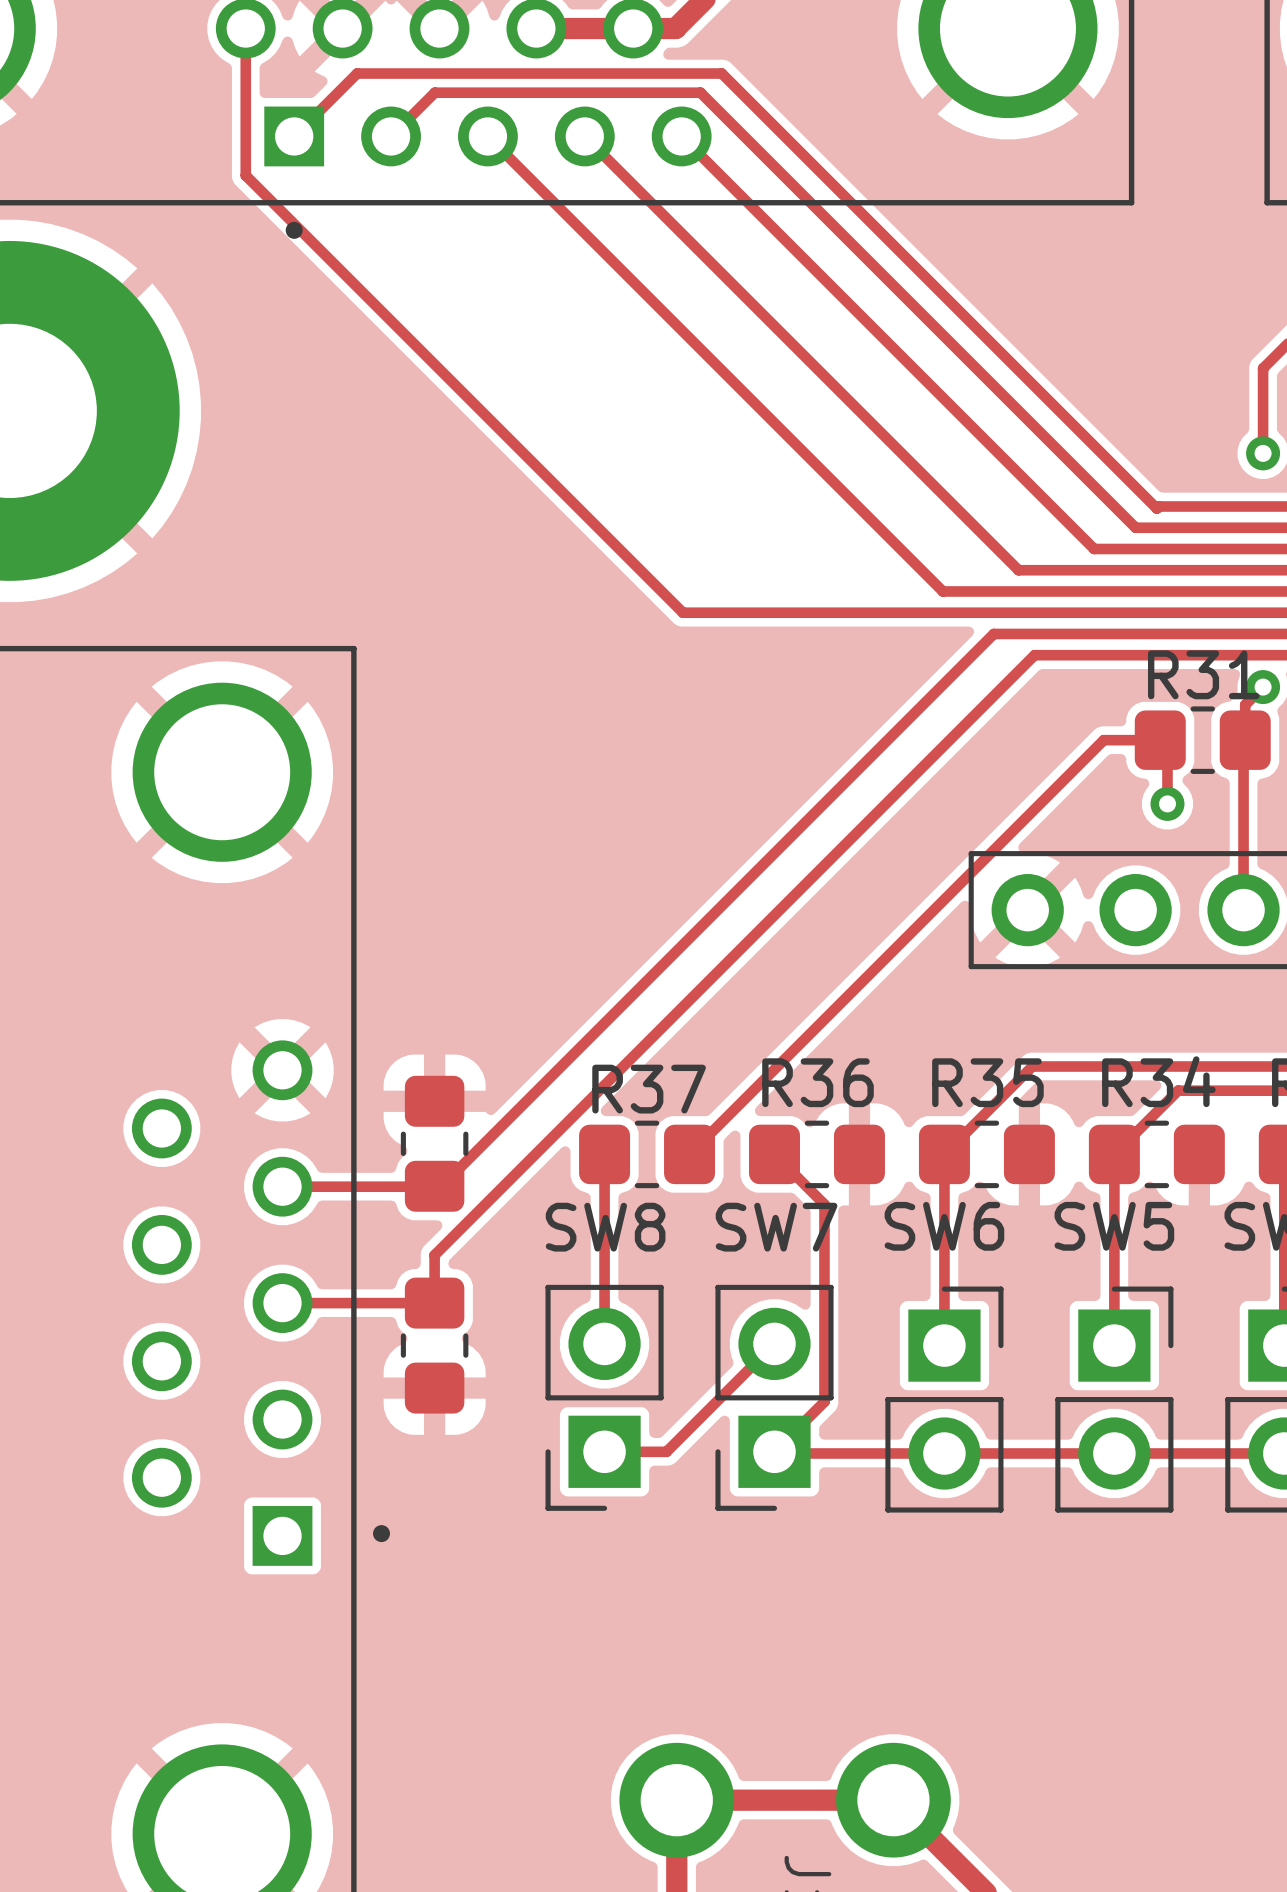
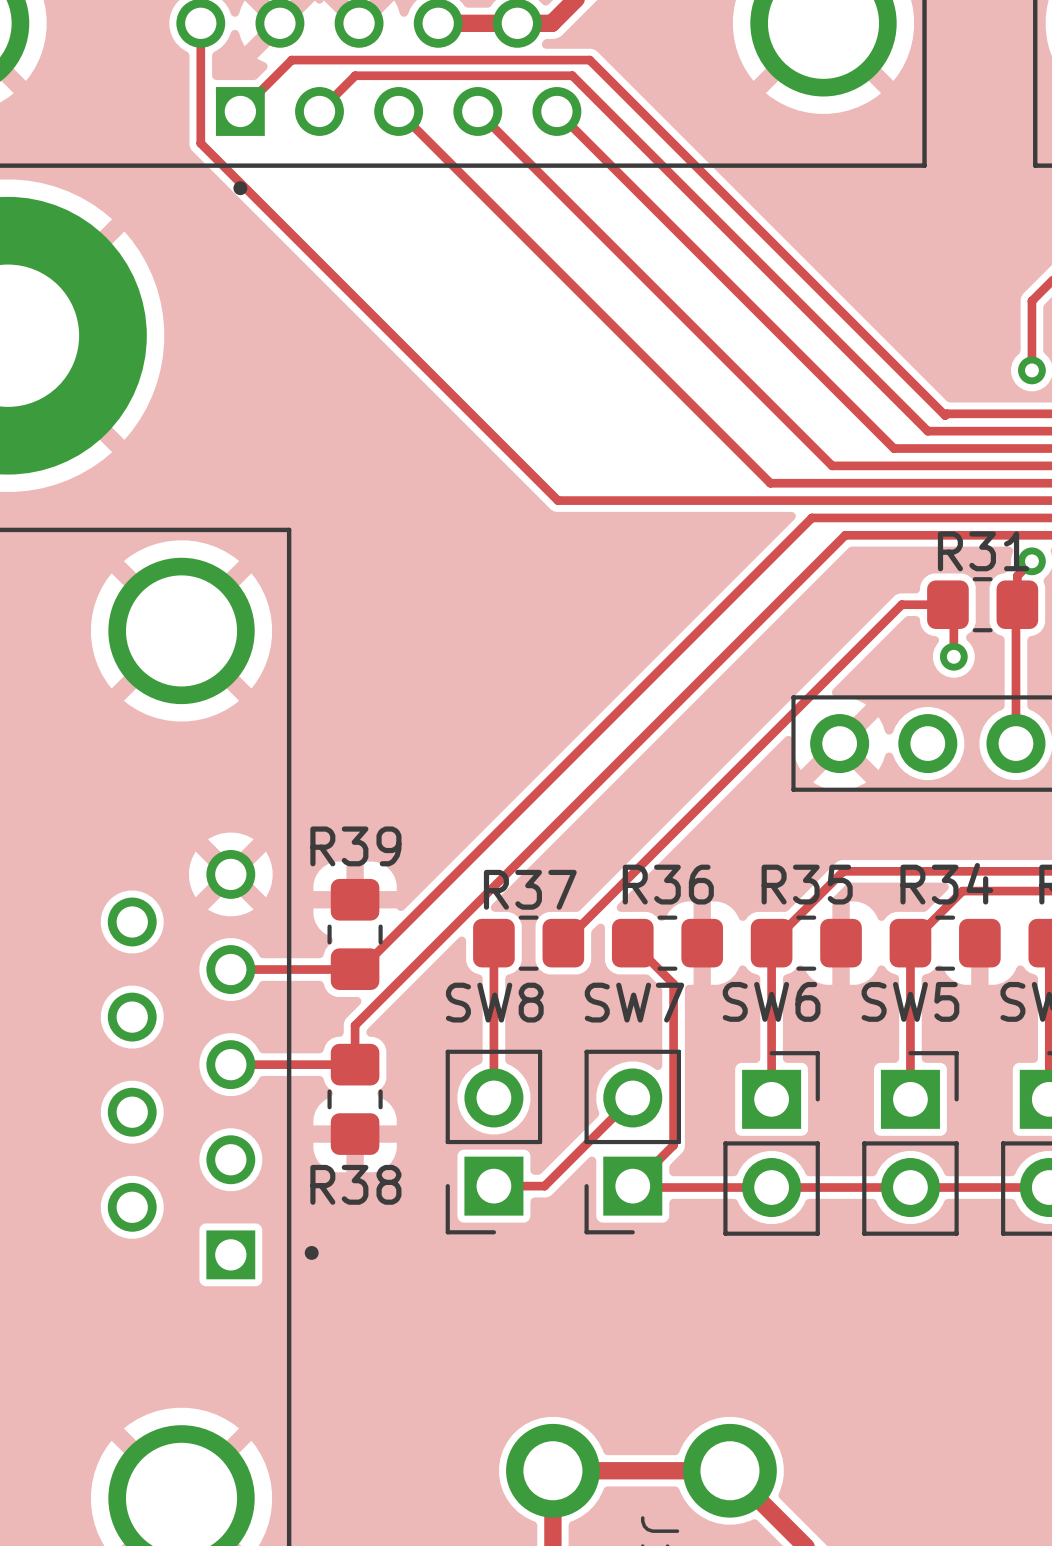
R39 name: none -> R39 (355, 846)
R38 name: none -> R38 (355, 1184)

